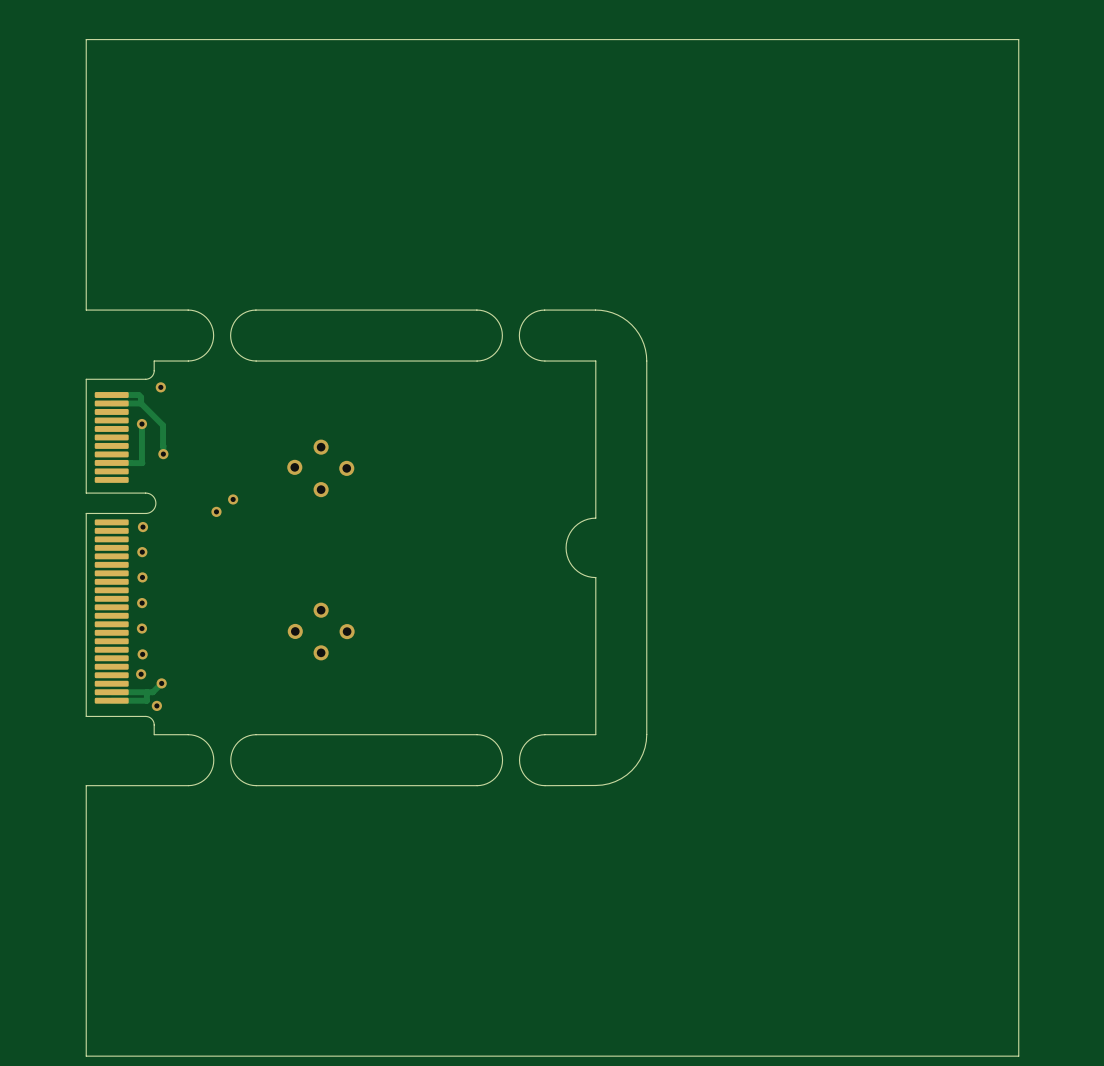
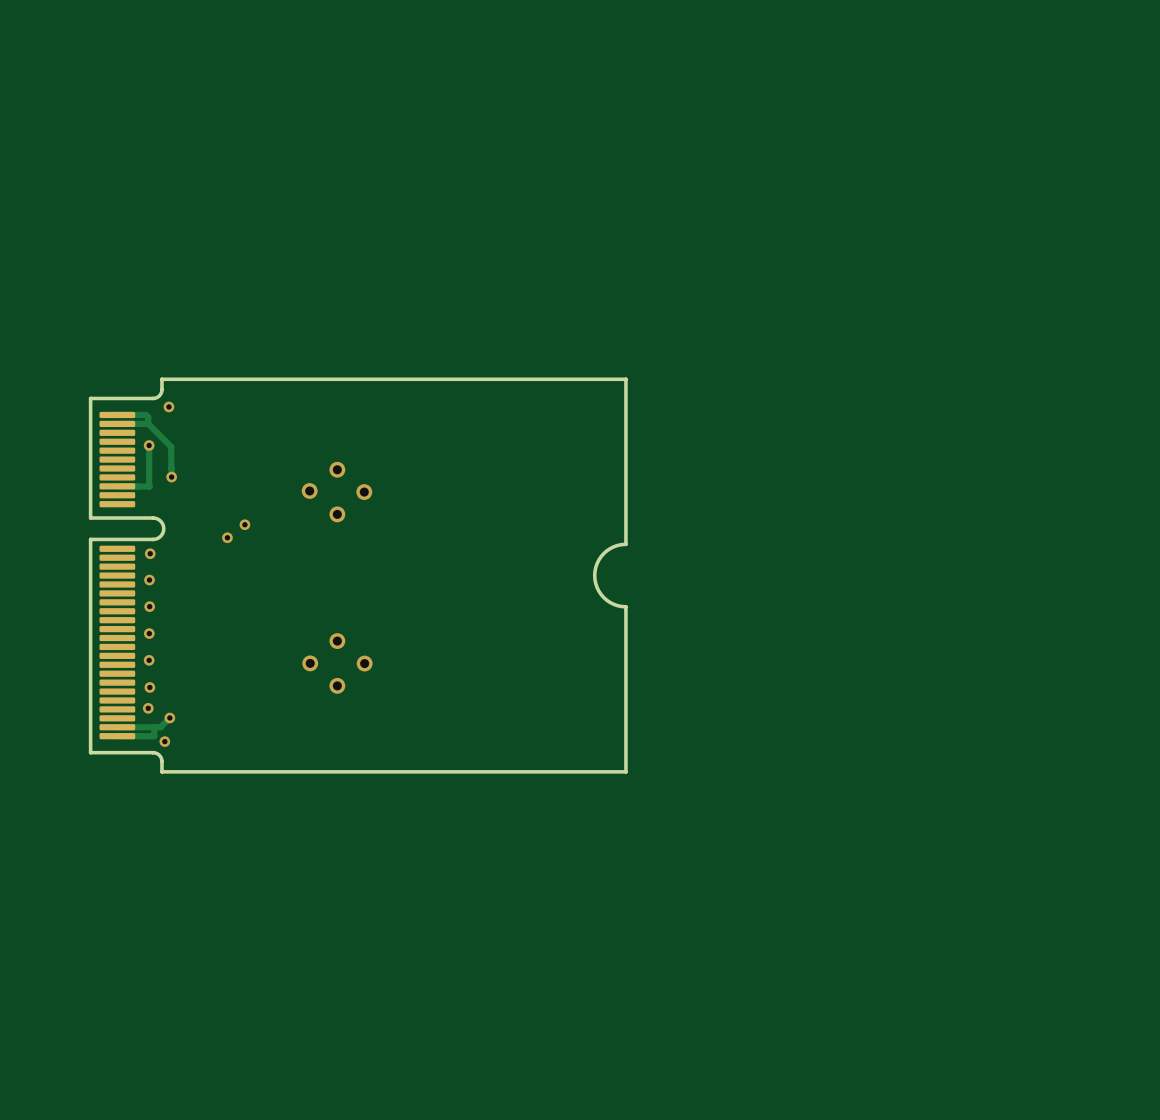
board edge: (476, 310) (252, 310) (243, 313) (235, 320) (231, 329) (230, 338) (238, 353) (252, 360) (480, 360) (495, 353) (500, 345) (502, 335) (500, 325) (494, 317) (486, 311) (476, 310) -> none
board edge: (544, 361) (535, 359) (526, 353) (521, 345) (519, 335) (521, 325) (526, 317) (534, 312) (544, 310) (601, 310) (617, 315) (631, 324) (638, 333) (646, 355) (646, 734) (645, 747) (639, 760) (631, 770) (621, 778) (608, 783) (541, 785) (532, 782) (522, 772) (519, 763) (520, 753) (524, 744) (532, 738) (544, 734) (595, 734) -> none
board edge: (545, 361) (595, 361) (595, 518) (584, 520) (574, 526) (568, 536) (566, 547) (568, 559) (574, 568) (584, 575) (595, 577) (595, 734) -> none
part: none -> (358, 575)
board edge: (154, 734) (191, 734) (201, 738) (211, 750) (212, 766) (206, 778) (191, 785) (86, 785) (86, 1056) (1018, 1056) (1018, 39) (86, 39) (86, 310) (191, 310) (206, 317) (213, 332) (211, 345) (203, 355) (191, 360) (154, 361) (153, 372) (148, 378) (86, 379) (86, 493) (146, 493) (153, 496) (155, 503) (153, 510) (146, 513) (86, 513) (86, 716) (147, 716) (153, 721) (154, 734) -> none
board edge: (477, 734) (252, 734) (243, 738) (235, 744) (231, 753) (231, 763) (238, 778) (252, 785) (480, 785) (495, 778) (500, 769) (502, 760) (500, 750) (495, 742) (486, 736) (477, 734) -> none

